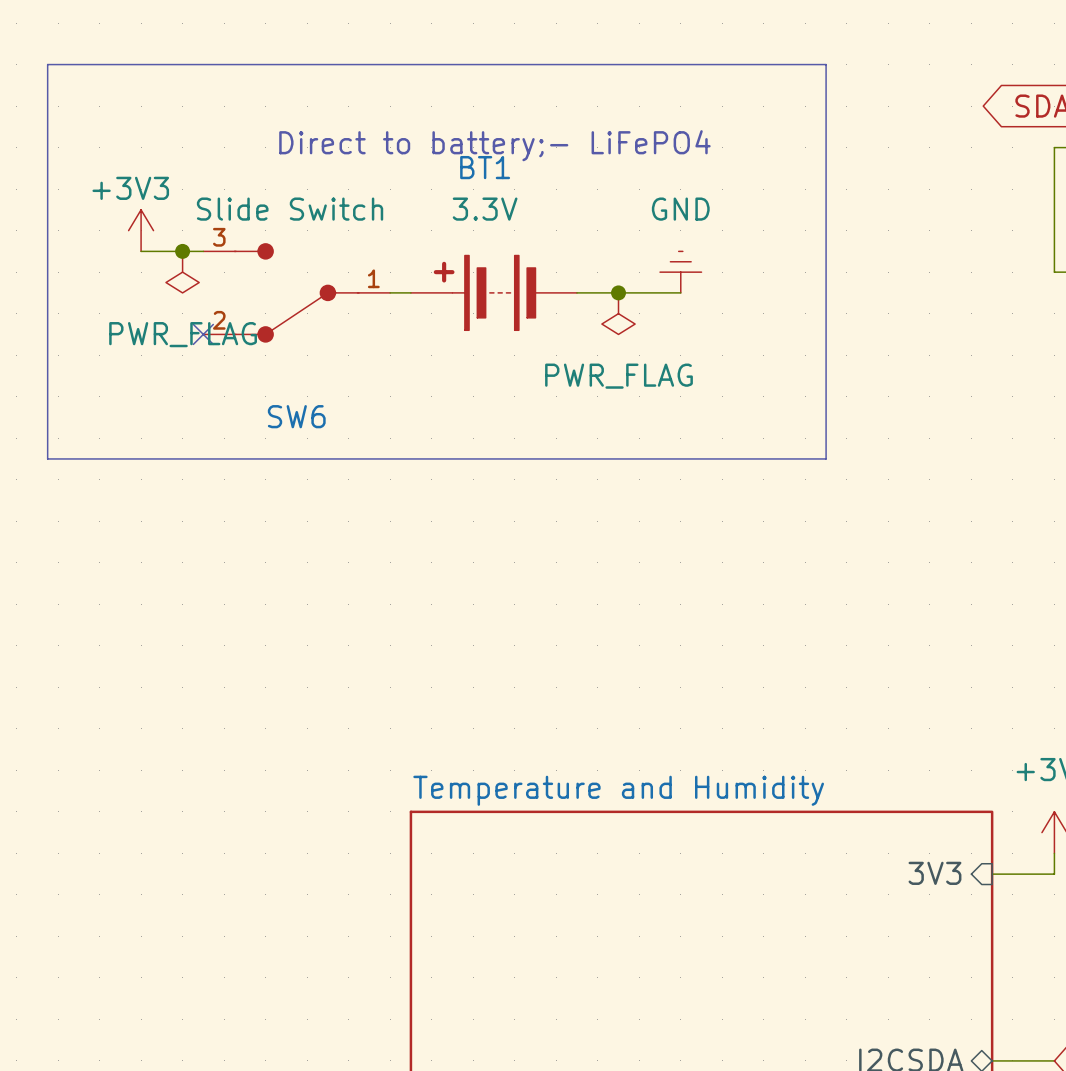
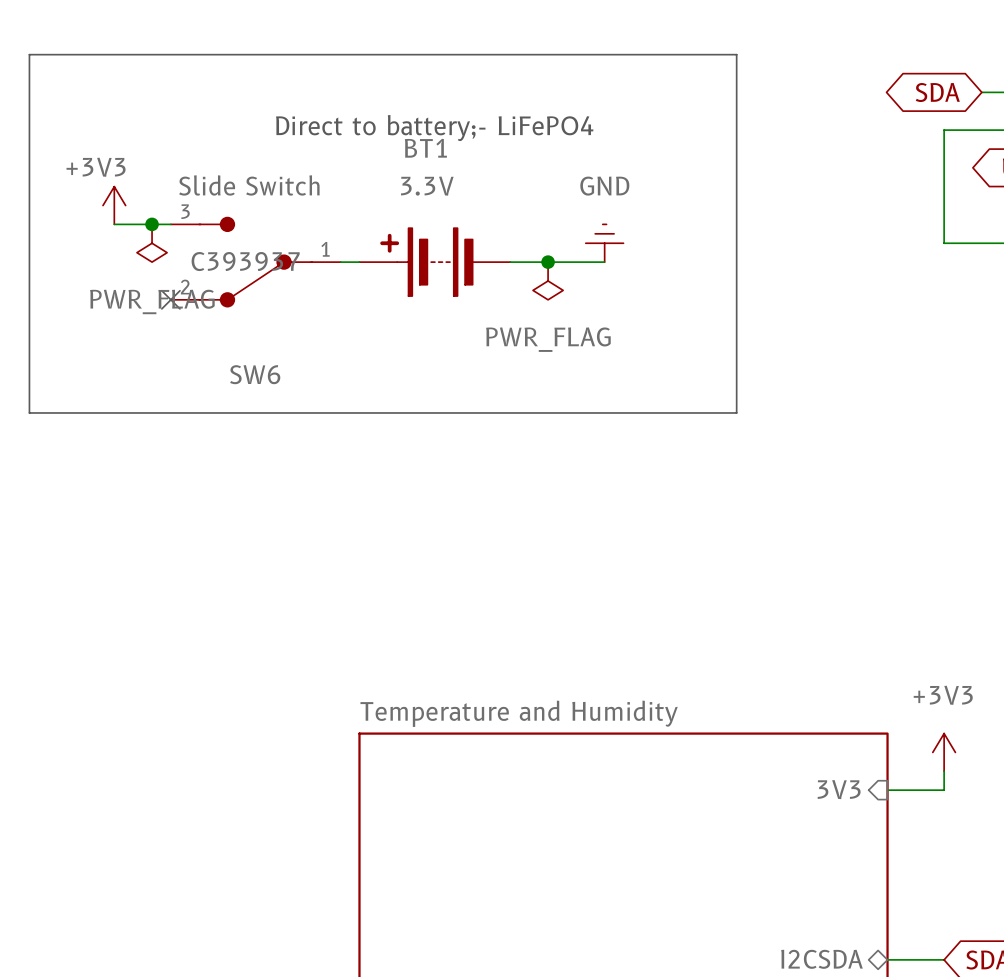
SW6 text: none -> C393937 (245, 261)

